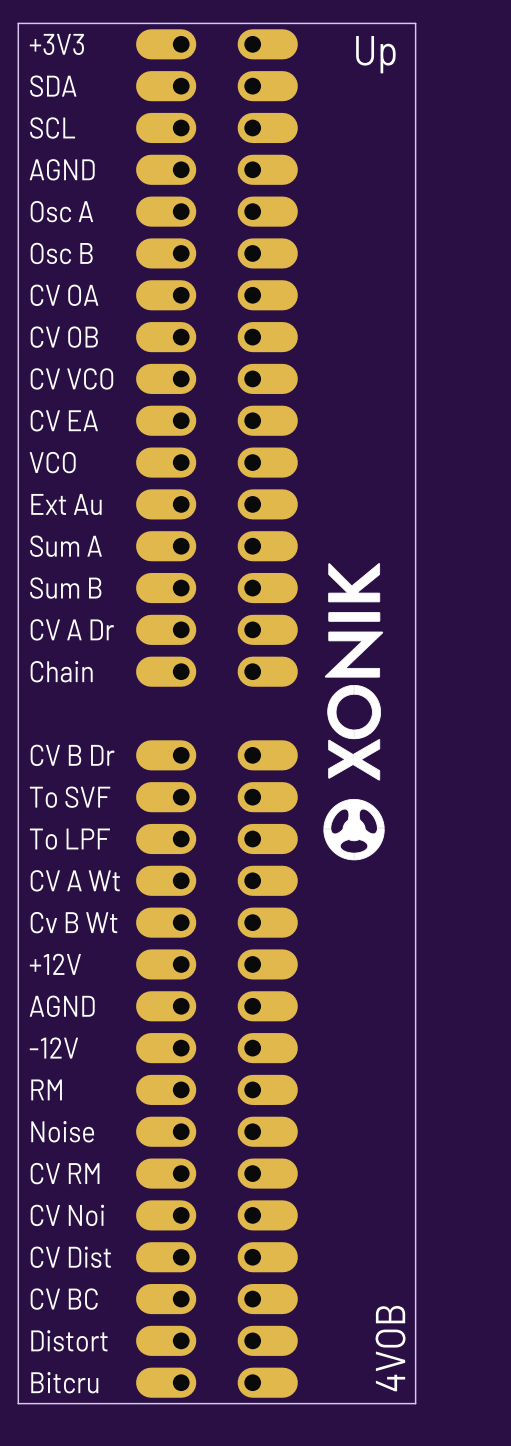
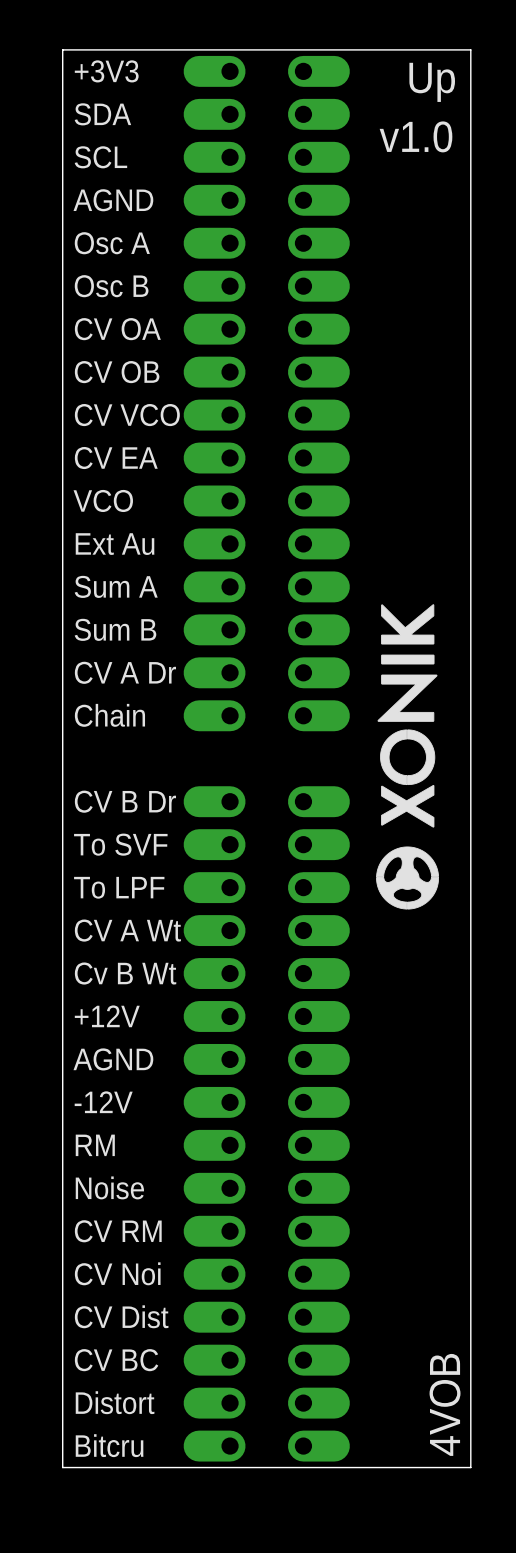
text: none -> v1.0 (415, 136)

